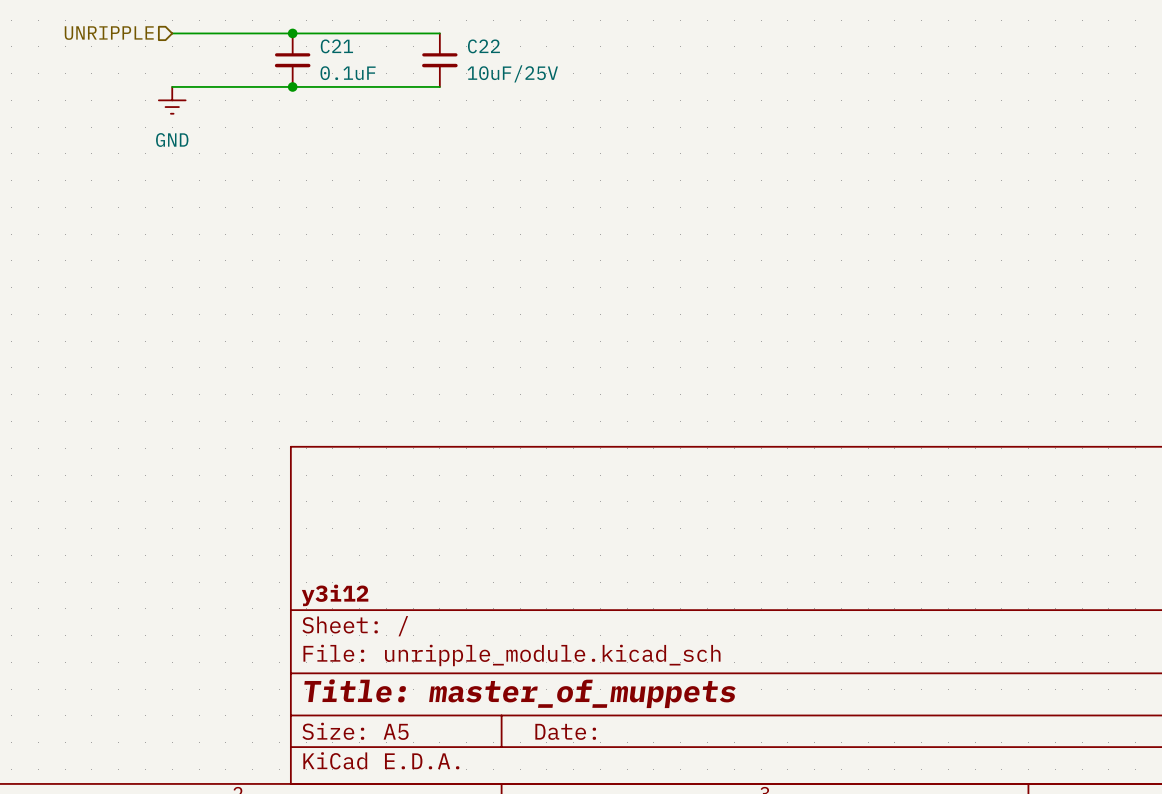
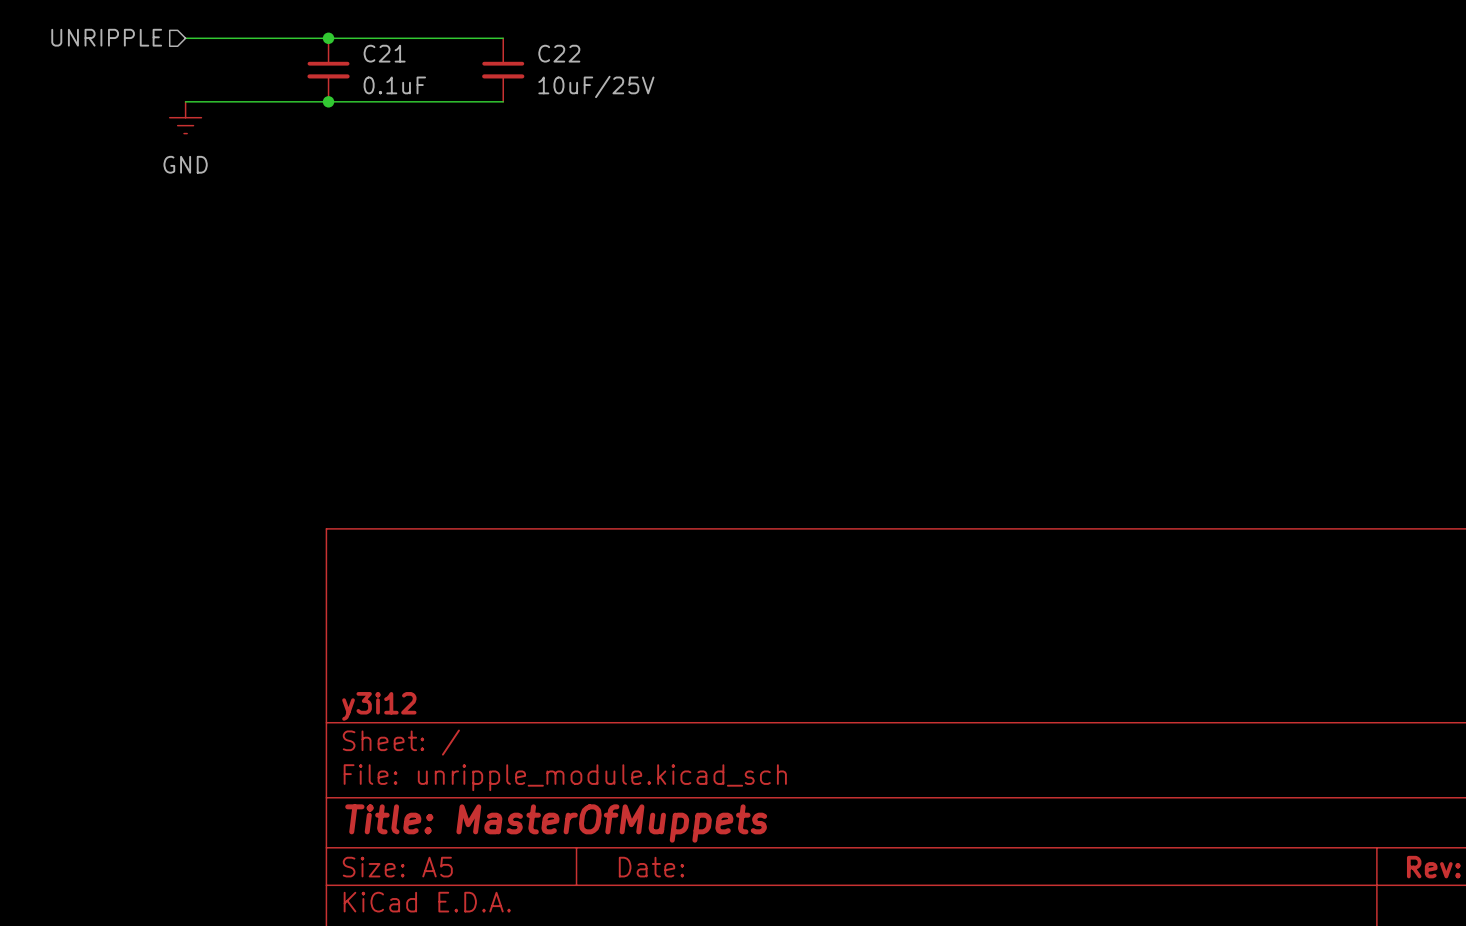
title block: Title: master_of_muppets (520, 693) -> Title: MasterOfMuppets (556, 823)

